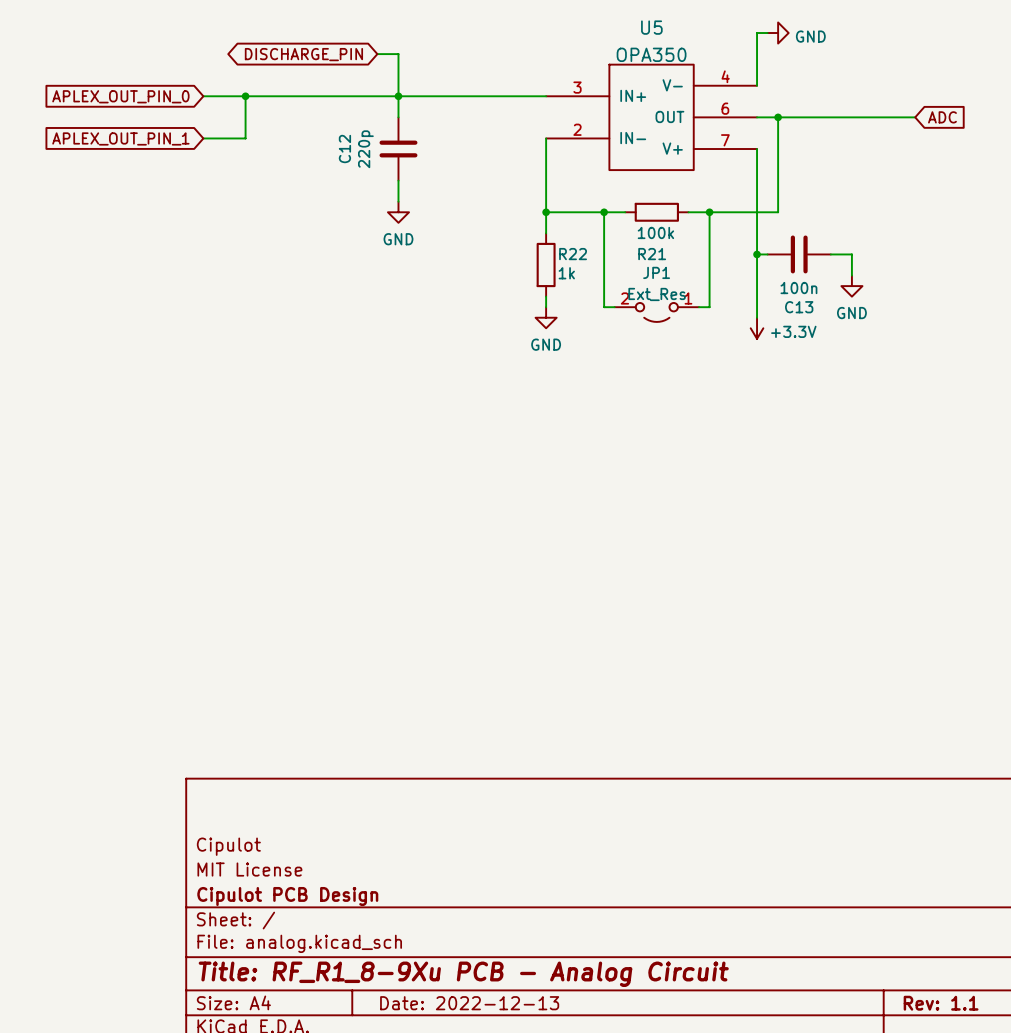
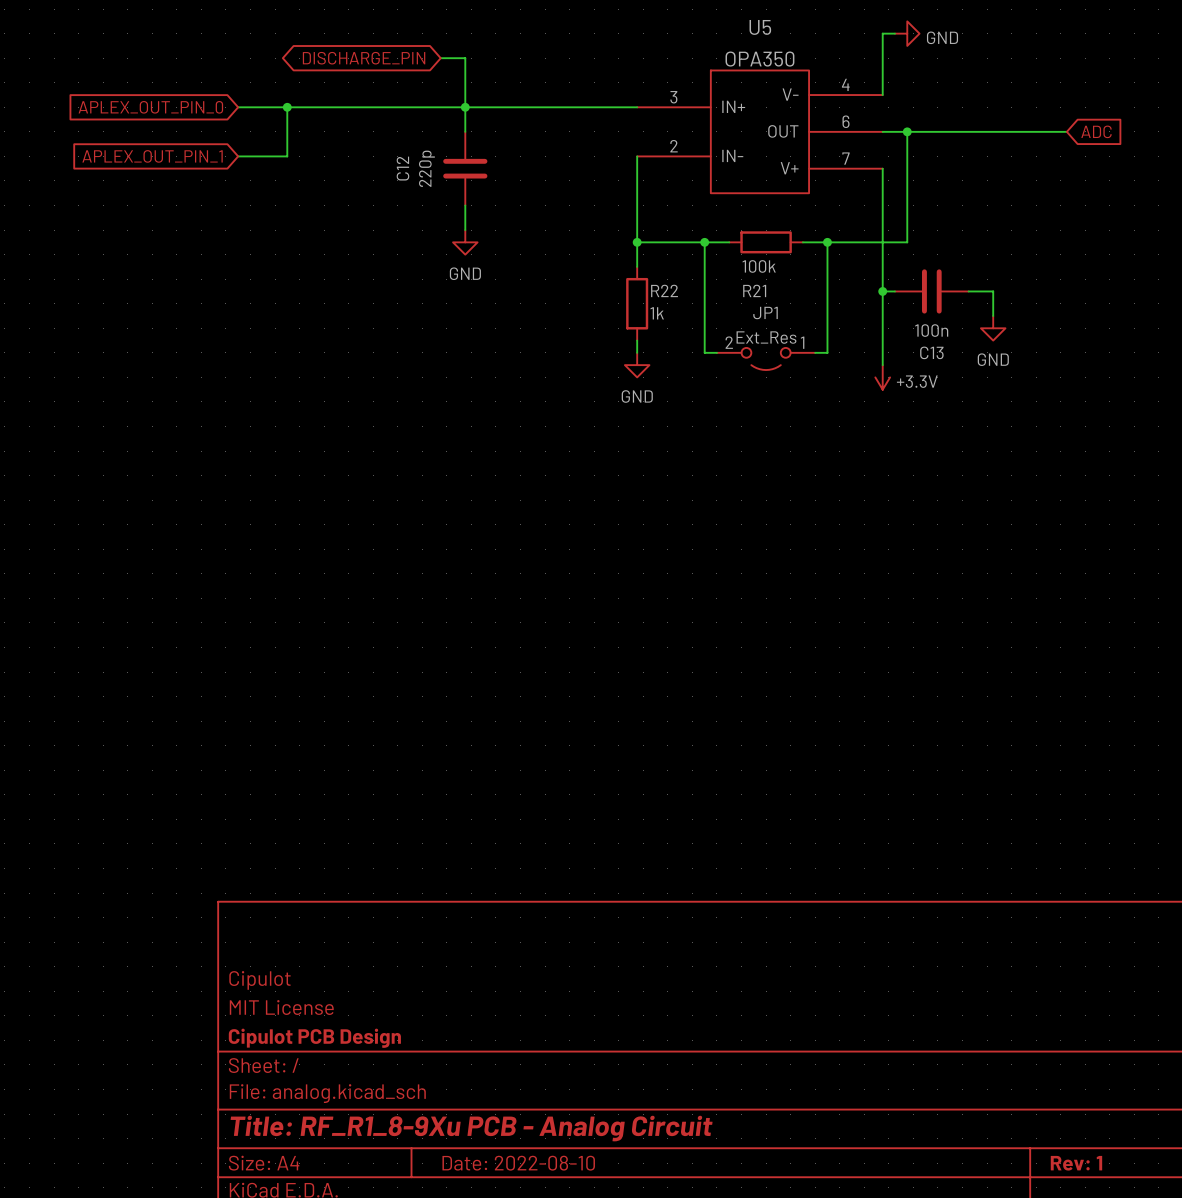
title block: Date: 2022-12-13 (469, 1003) -> Date: 2022-08-10 (518, 1163)
title block: Rev: 1.1 (941, 1003) -> Rev: 1 (1076, 1163)

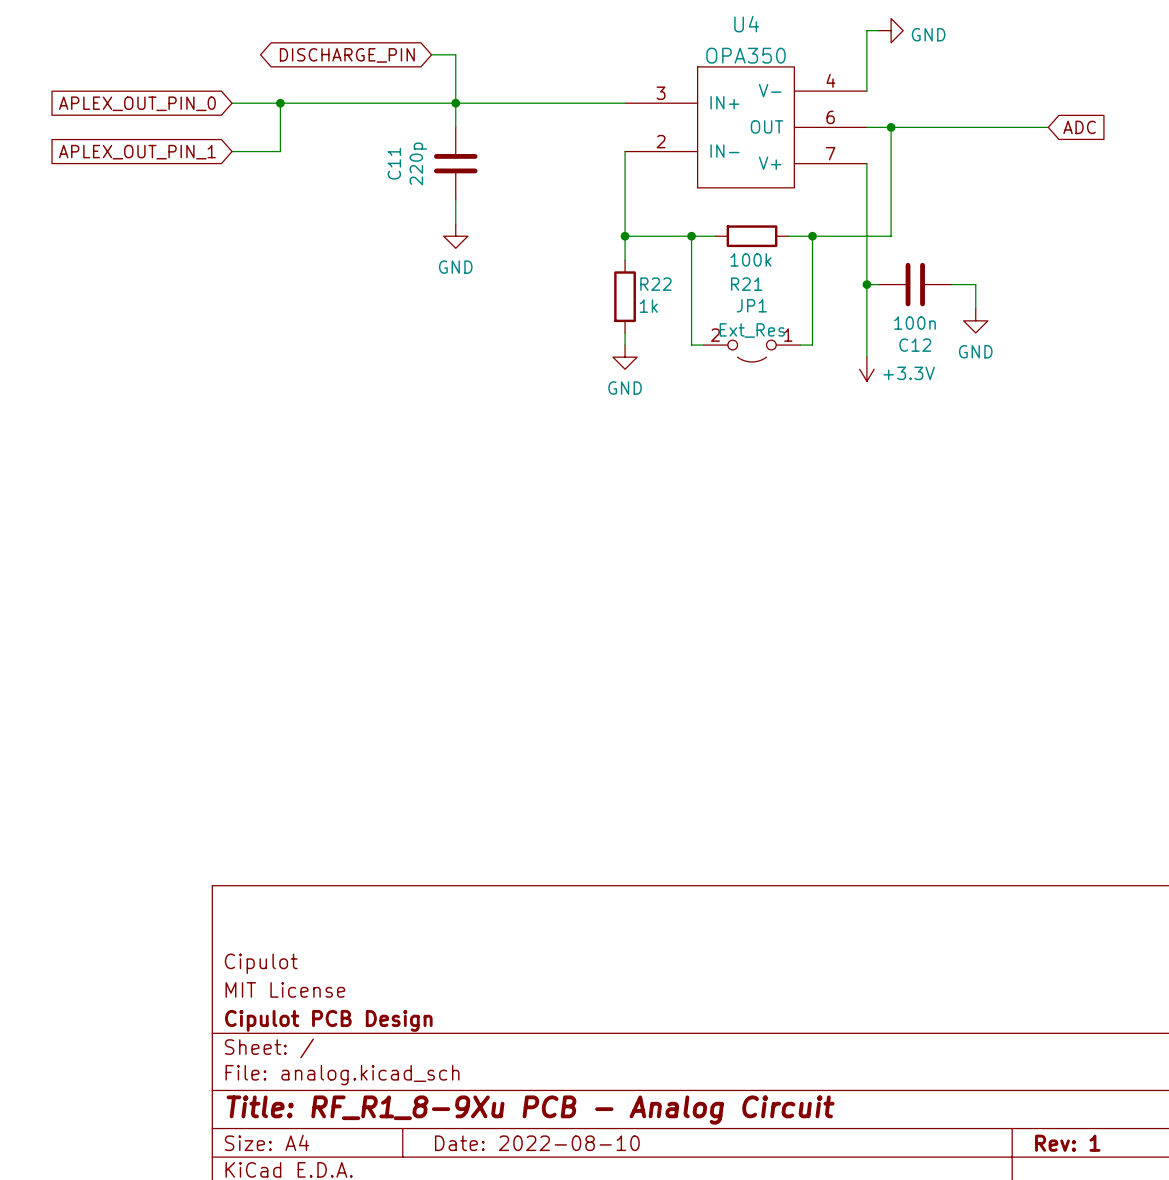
U5 name: U5 (760, 27) -> U4 (746, 24)
C12 name: C12 (402, 168) -> C11 (394, 163)
C13 name: C13 (931, 352) -> C12 (915, 345)

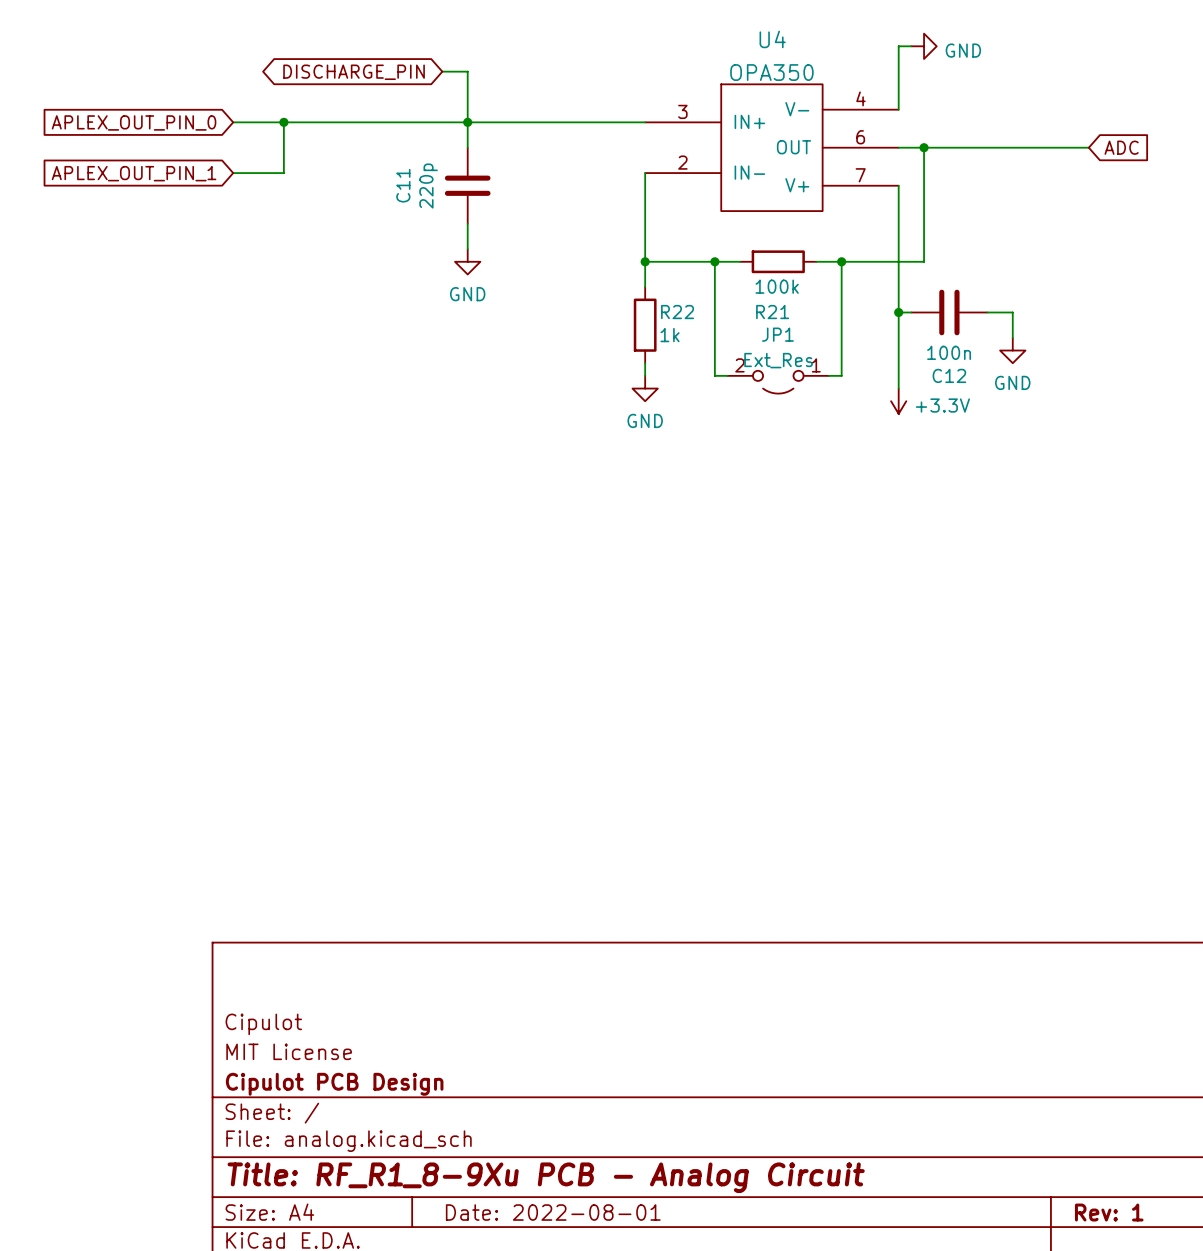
title block: Date: 2022-08-10 (537, 1143) -> Date: 2022-08-01 (553, 1212)

